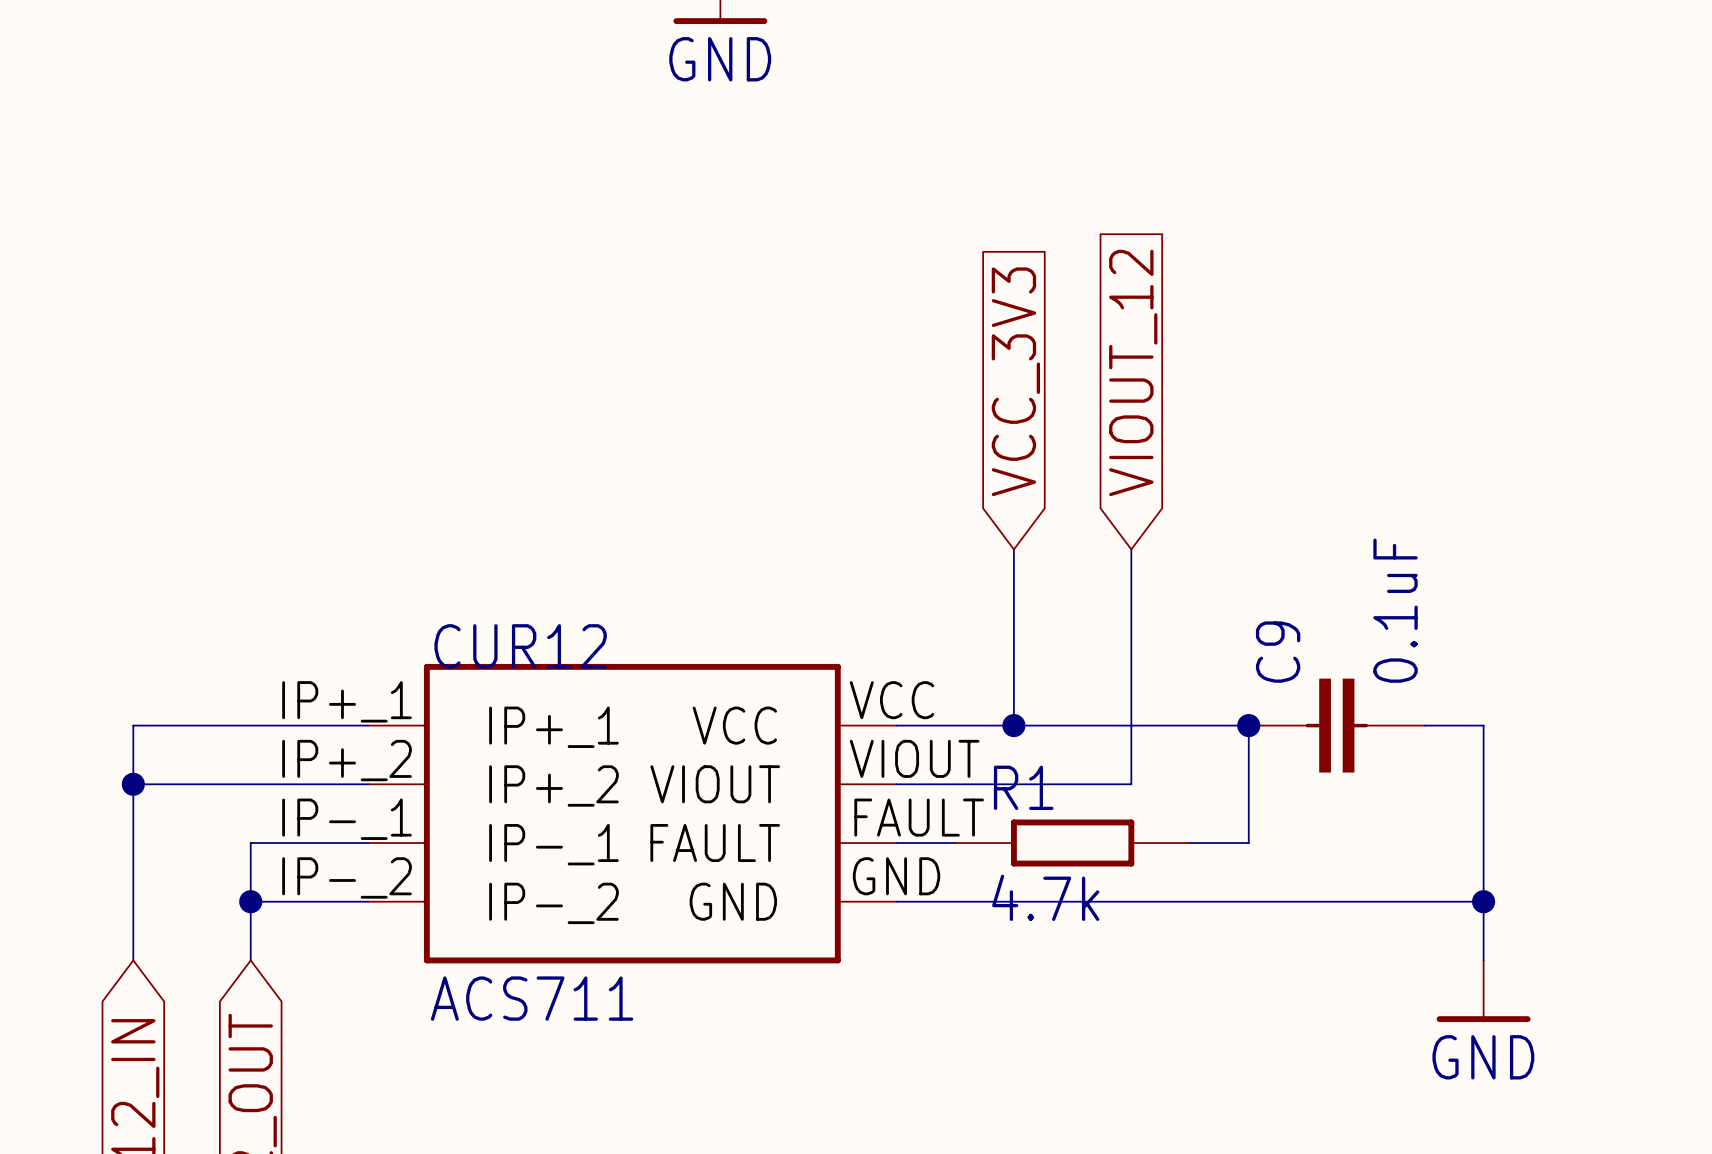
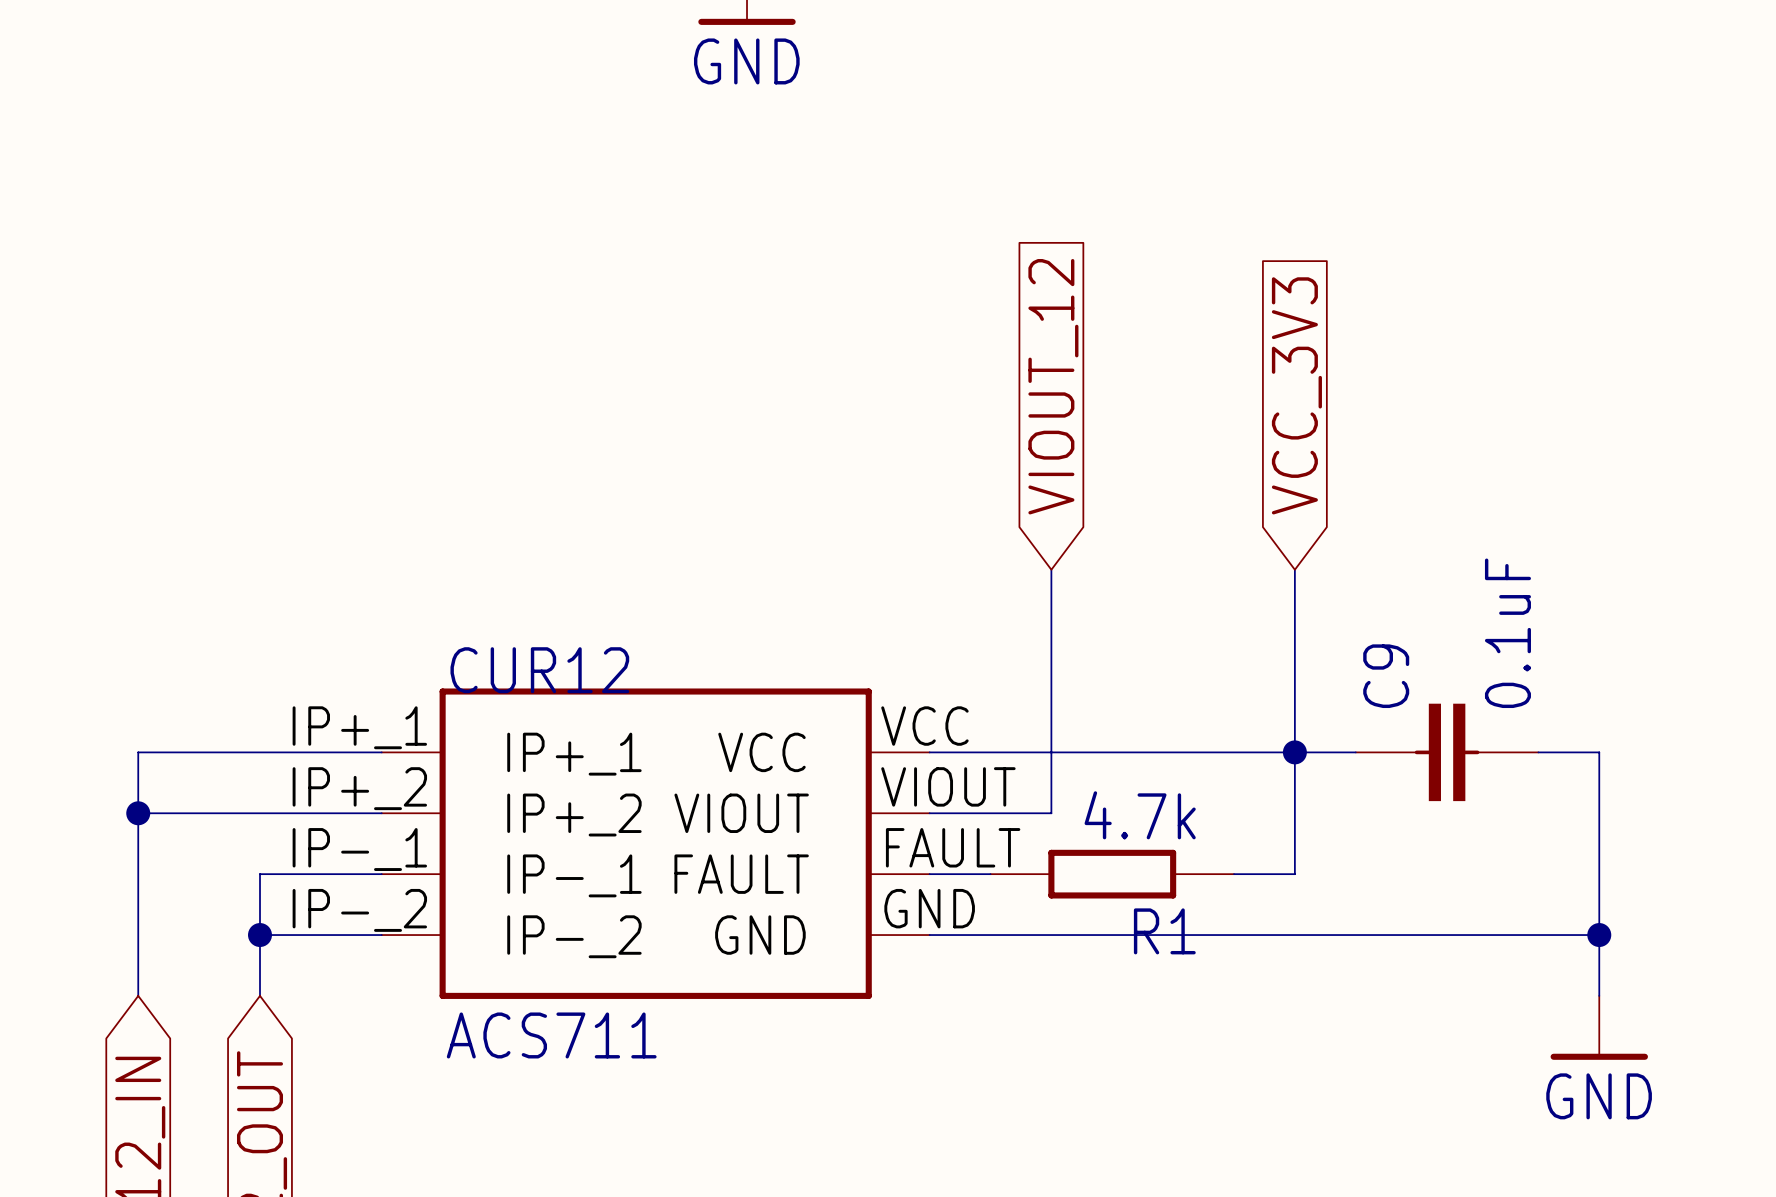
global label: VIOUT_12 (1133, 372) -> none
global label: VCC_3V3 (1015, 381) -> VIOUT_12 (1053, 386)
global label: none -> VCC_3V3 (1296, 395)
wire: (1131, 549) (1131, 784) (1013, 784) -> (1051, 752) (1051, 813)
wire: none -> (1294, 569) (1294, 752) (1355, 752)
junction: (1013, 725) -> none
C9 position: (1336, 725) -> (1447, 752)
wire: (1424, 725) (1483, 725) (1483, 960) -> (1538, 752) (1599, 752) (1599, 995)
R1 name position: R1 (1023, 787) -> R1 (1164, 931)
R1 value position: 4.7k (1045, 897) -> 4.7k (1140, 815)
wire: none -> (1538, 935) (1599, 935)
junction position: (1483, 901) -> (1599, 935)
power symbol position: GND (1483, 991) -> GND (1599, 1027)

